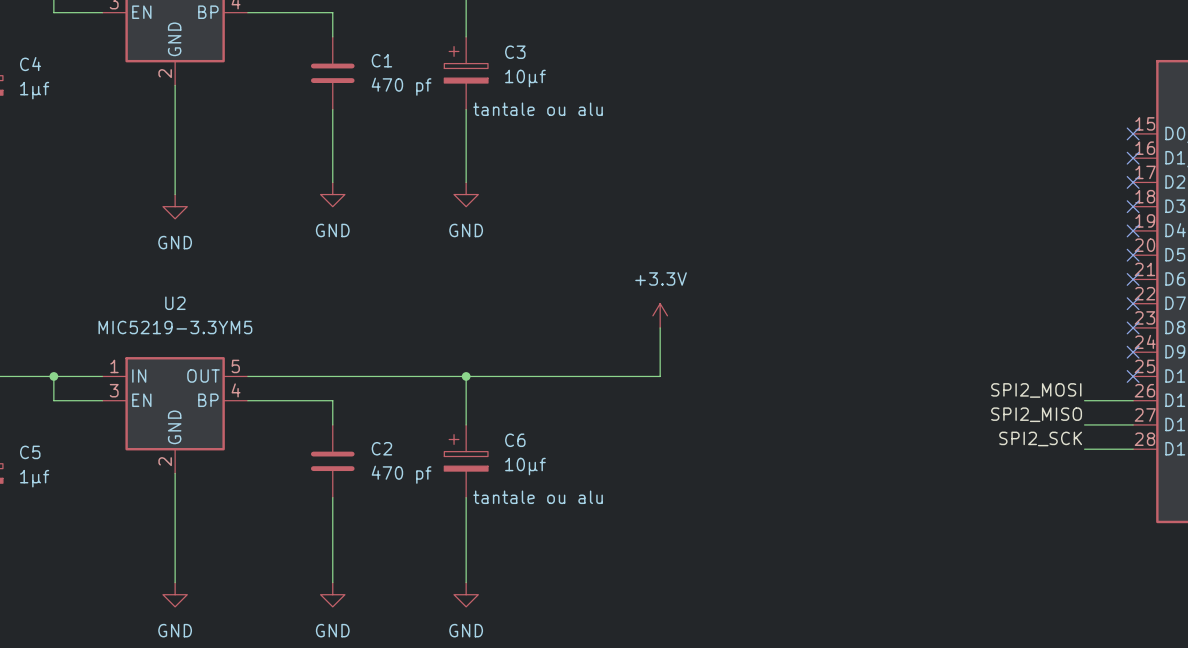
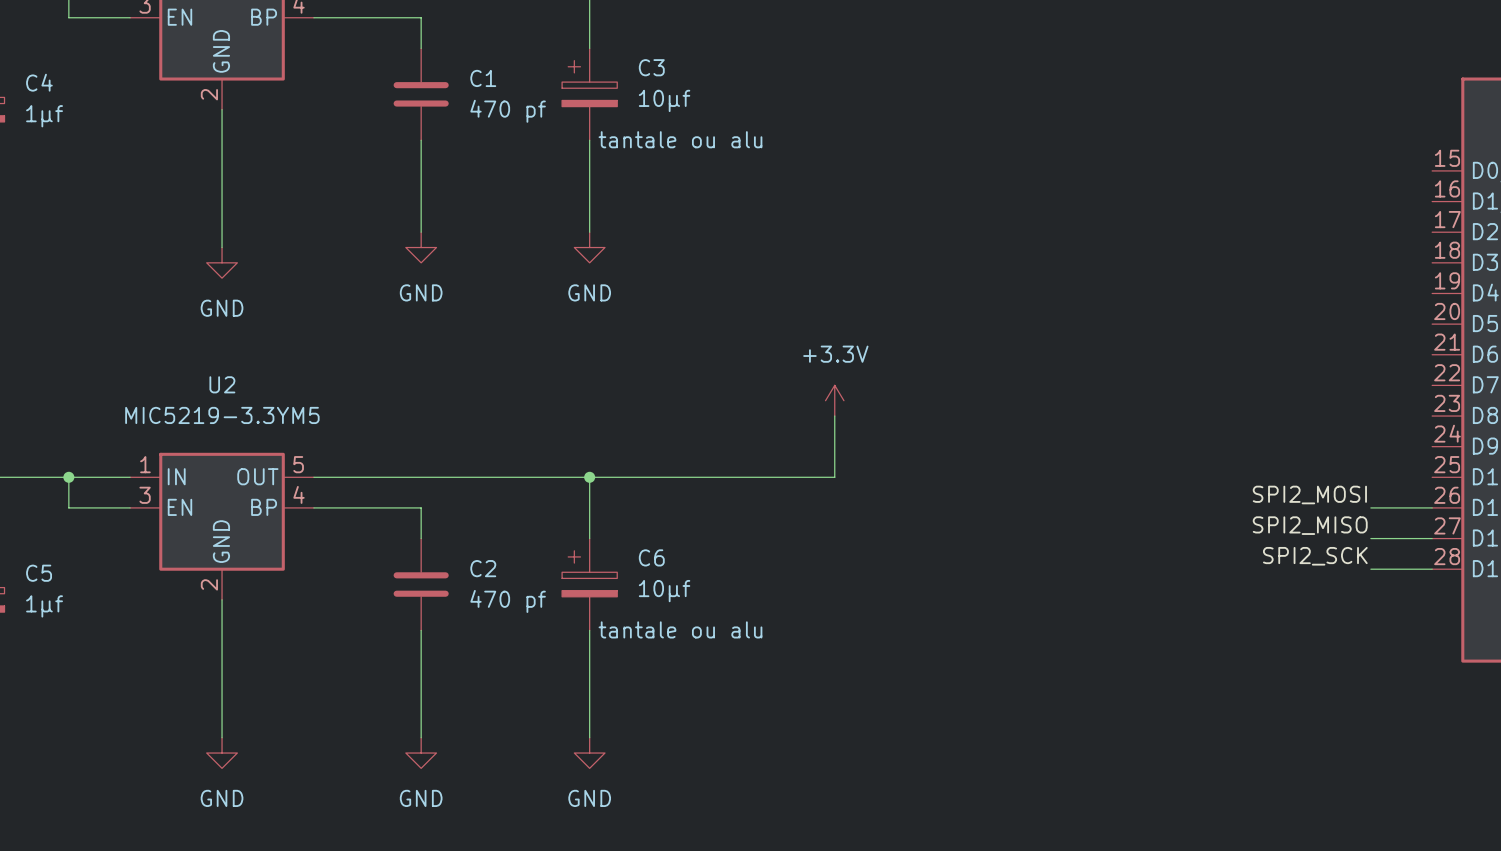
no-connect mark: (1133, 133) -> none
no-connect mark: (1133, 158) -> none
no-connect mark: (1133, 182) -> none
no-connect mark: (1133, 206) -> none
no-connect mark: (1133, 230) -> none
no-connect mark: (1133, 255) -> none
no-connect mark: (1133, 279) -> none
no-connect mark: (1133, 303) -> none
no-connect mark: (1133, 327) -> none
no-connect mark: (1133, 352) -> none
no-connect mark: (1133, 376) -> none

